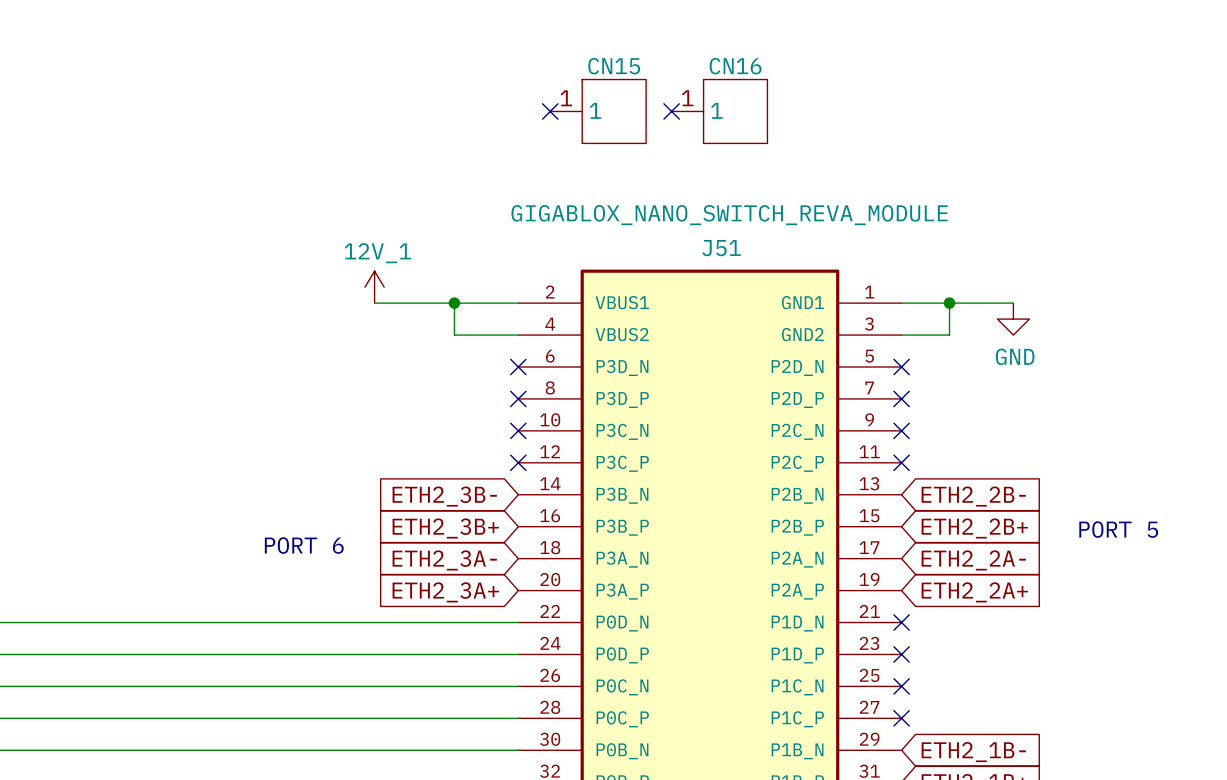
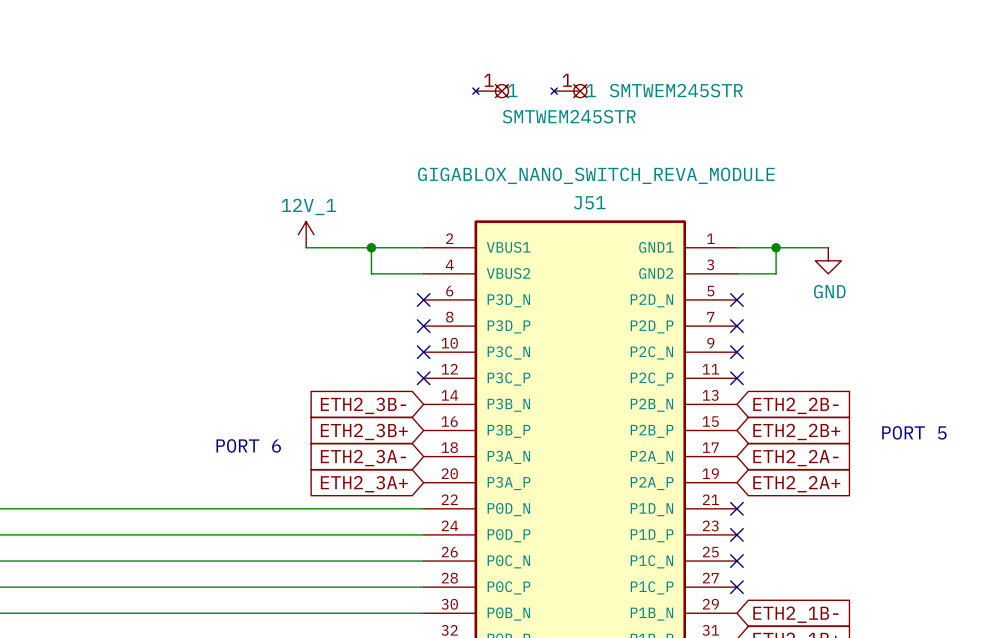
no-connect mark: (550, 111) -> none
CN15: (598, 111) -> none
part: none -> SMTWEM245STR (490, 91)
no-connect mark: (671, 111) -> none
part: none -> SMTWEM245STR (568, 91)
CN16: (719, 111) -> none

